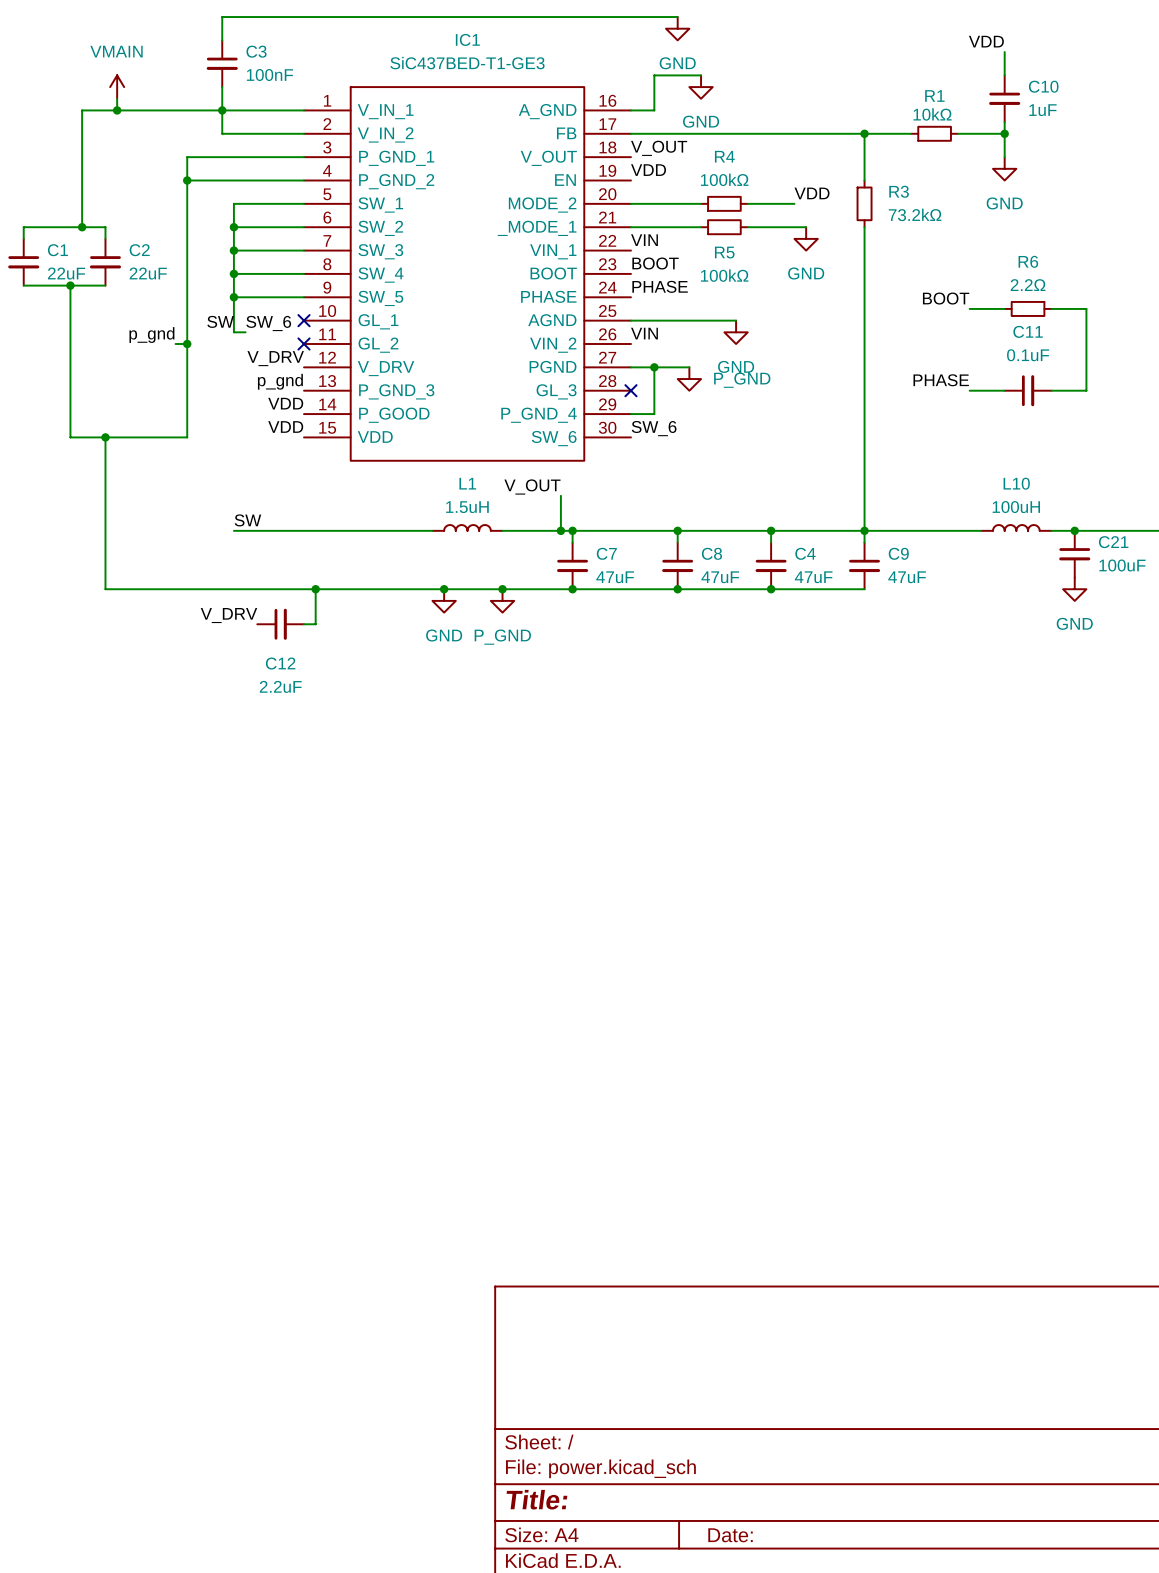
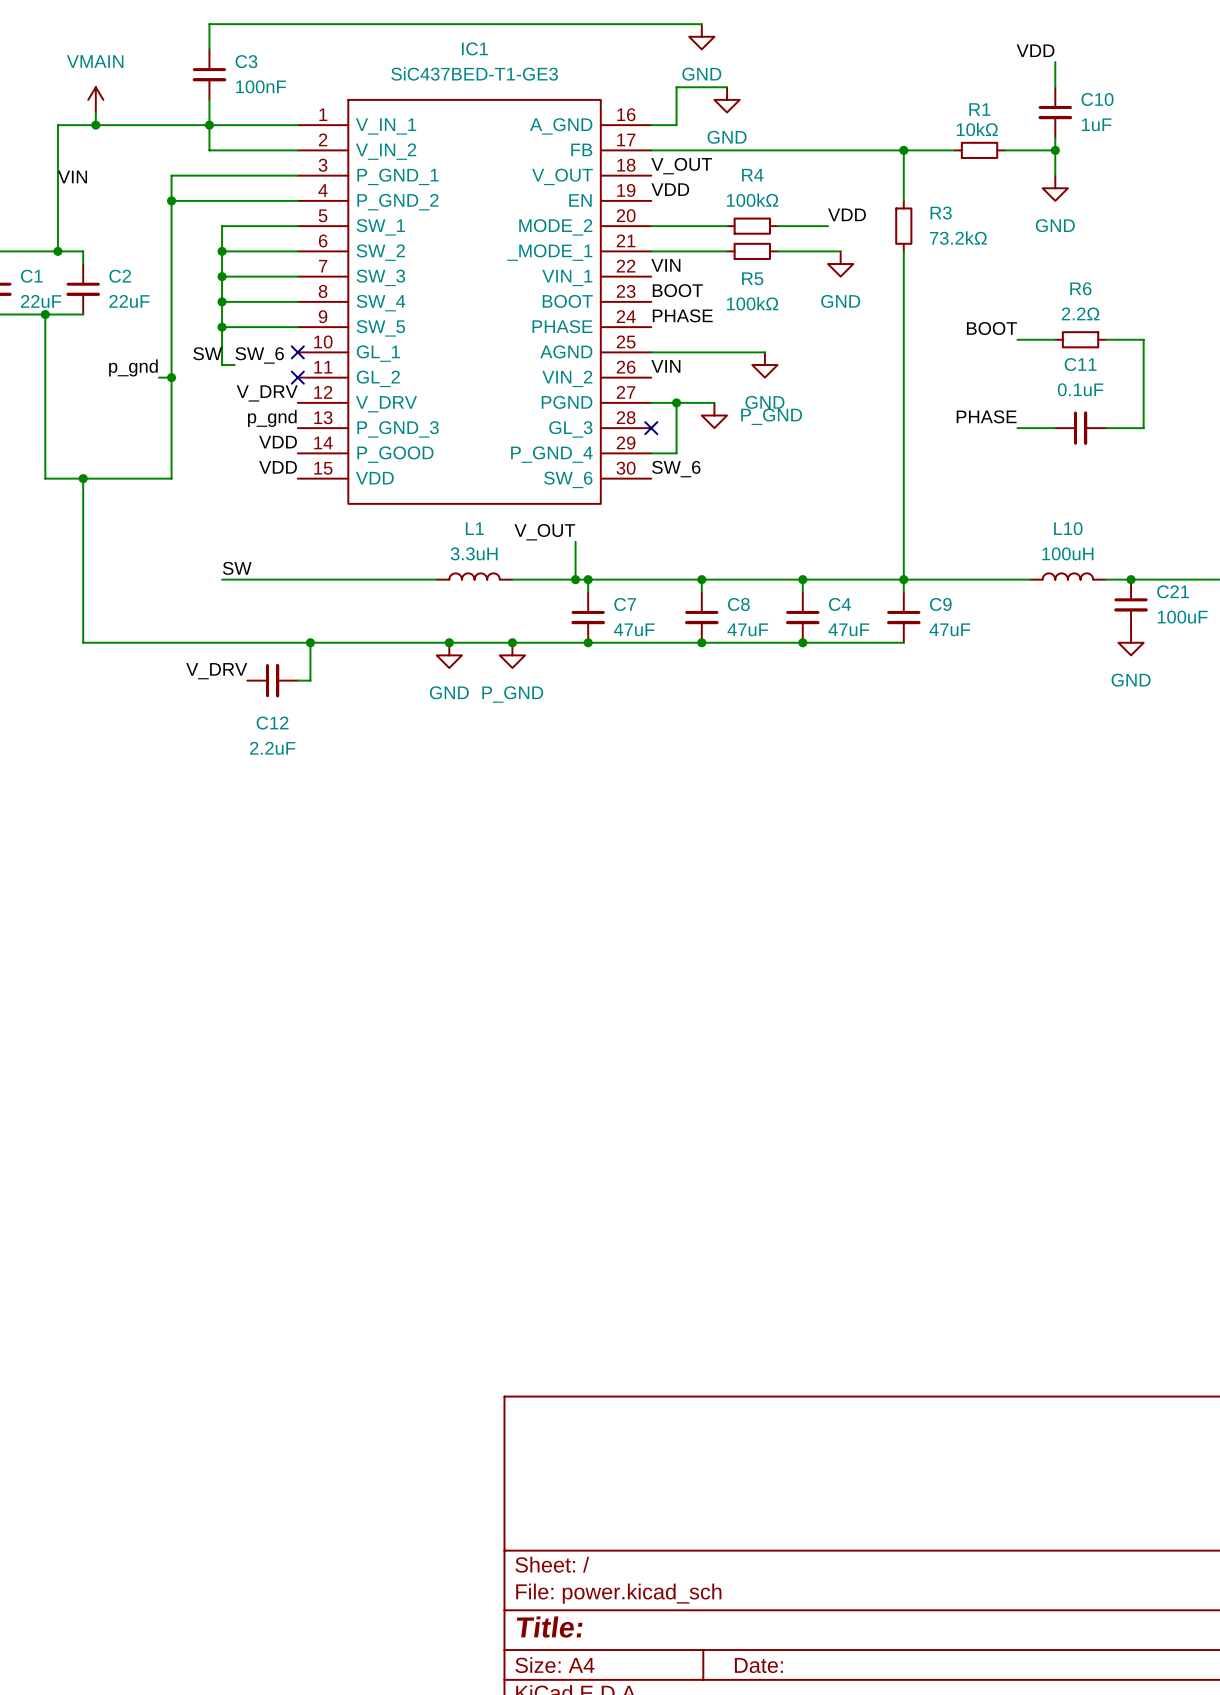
label: none -> VIN (72, 177)
L1 value: 1.5uH (467, 507) -> 3.3uH (474, 553)

